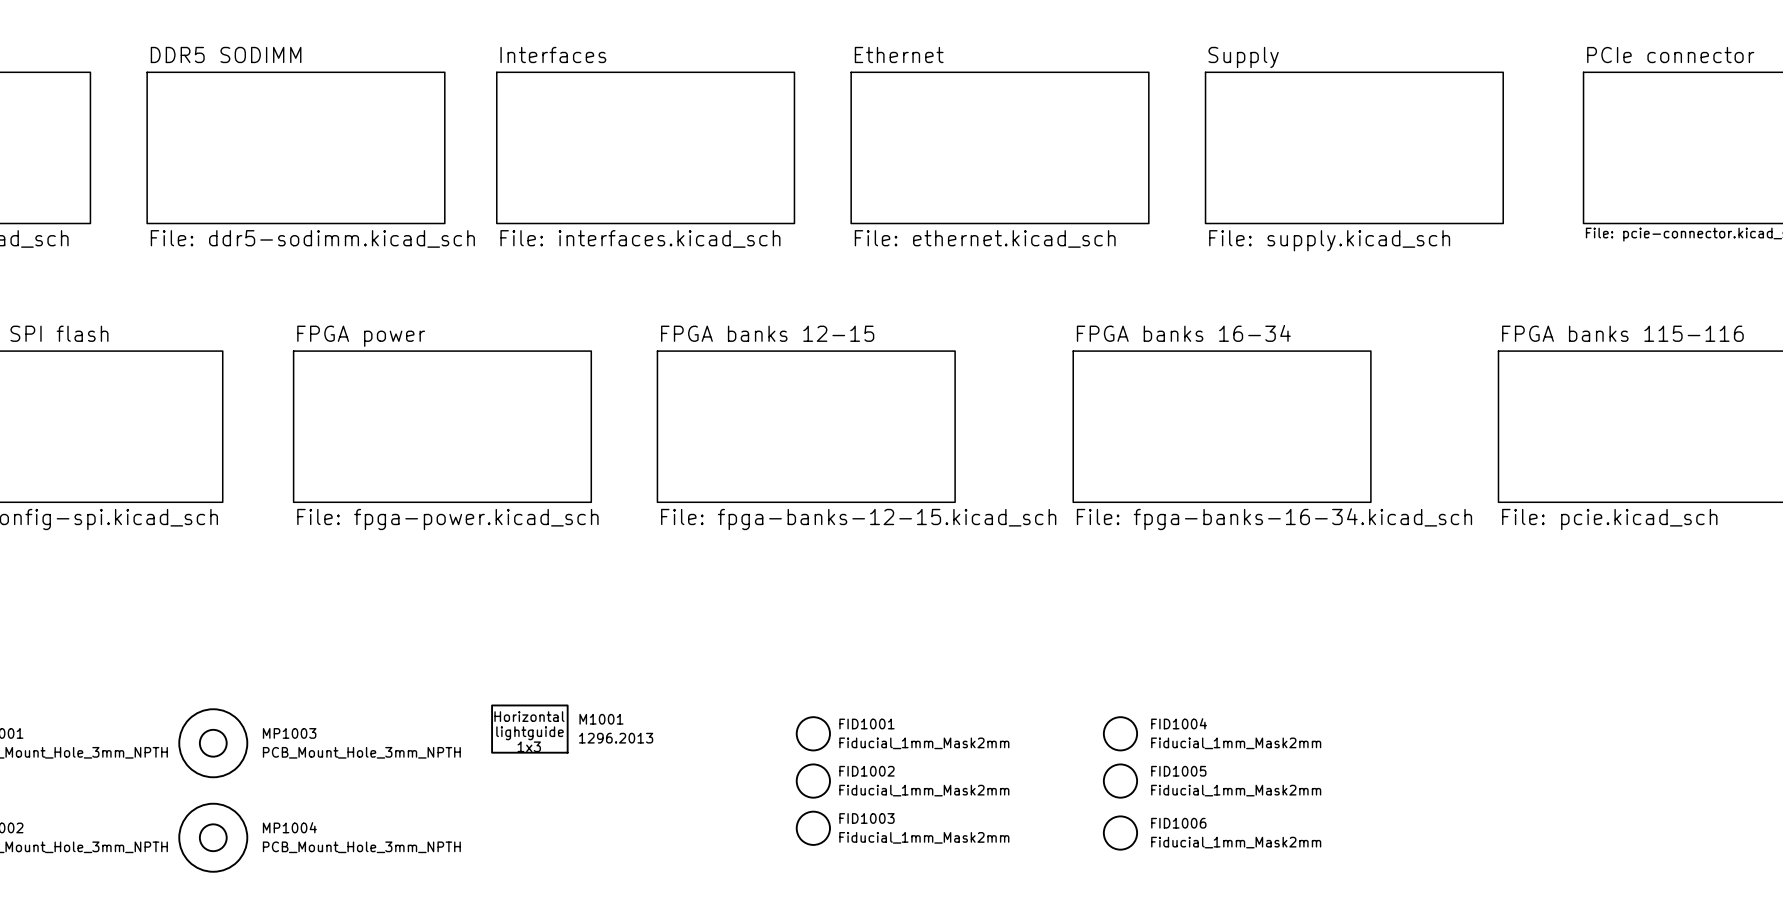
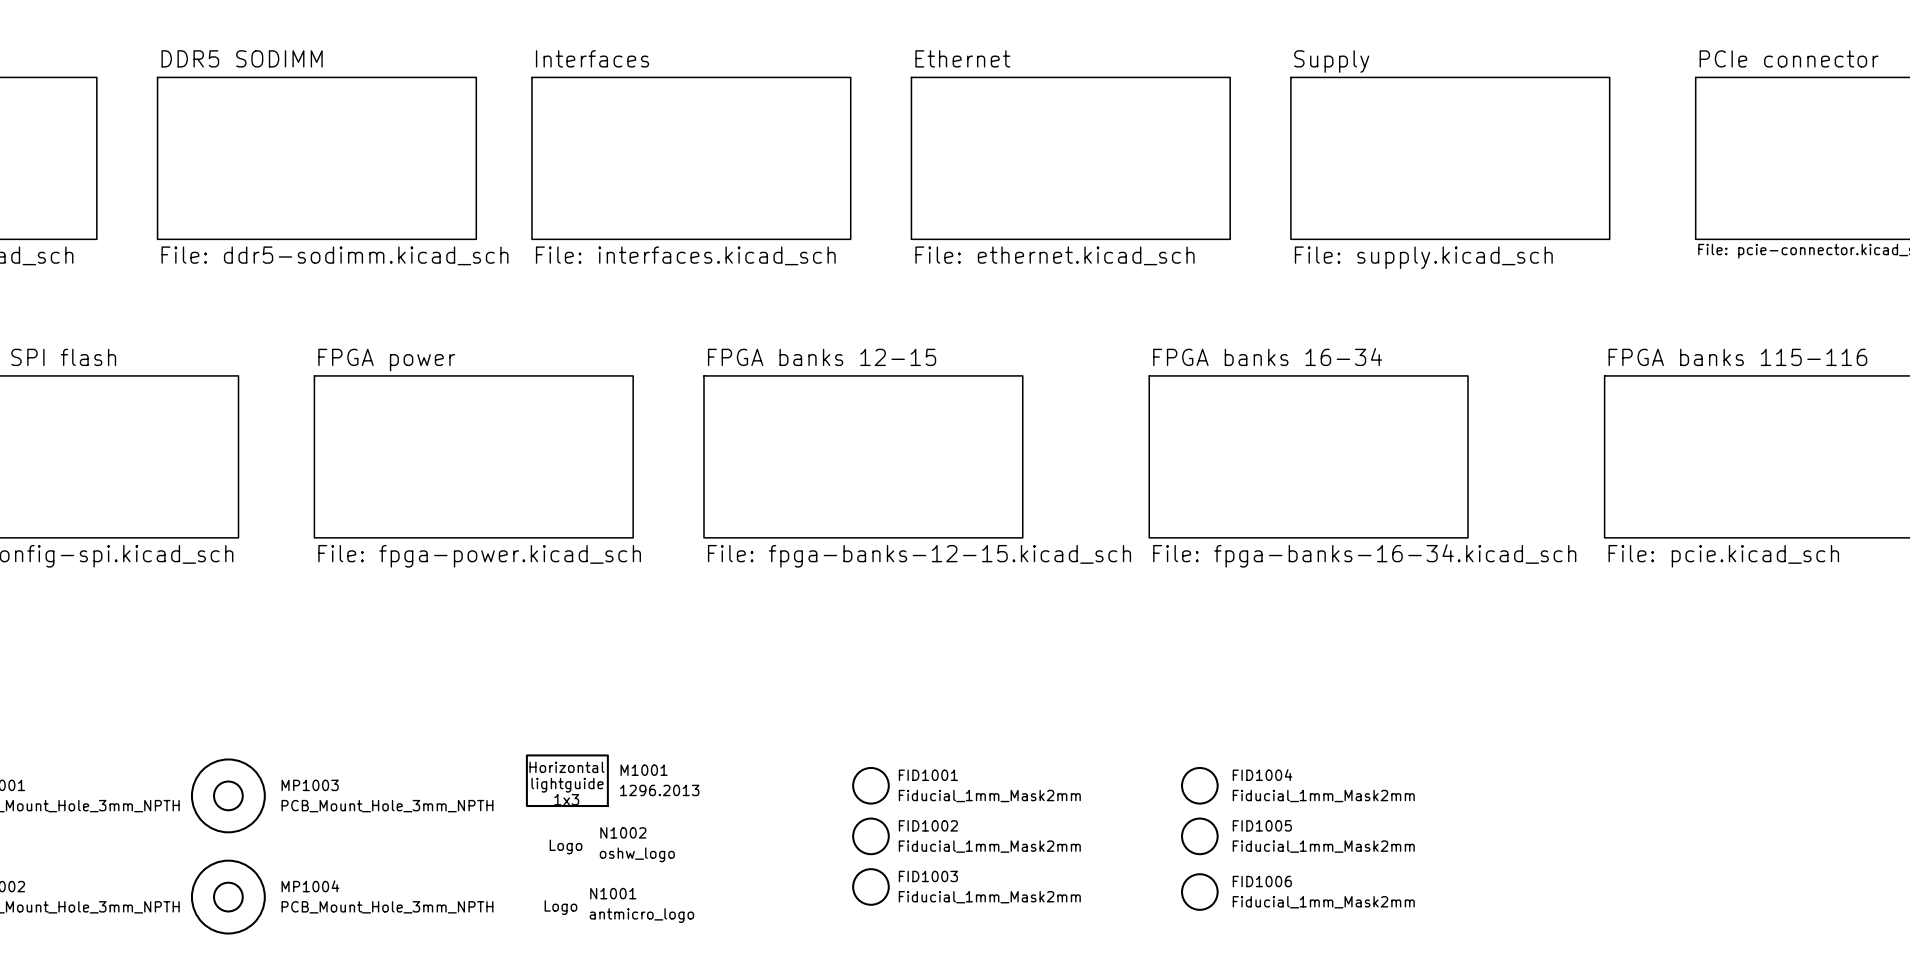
N1002: none -> oshw_logo (612, 844)
N1001: none -> antmicro_logo (619, 905)

